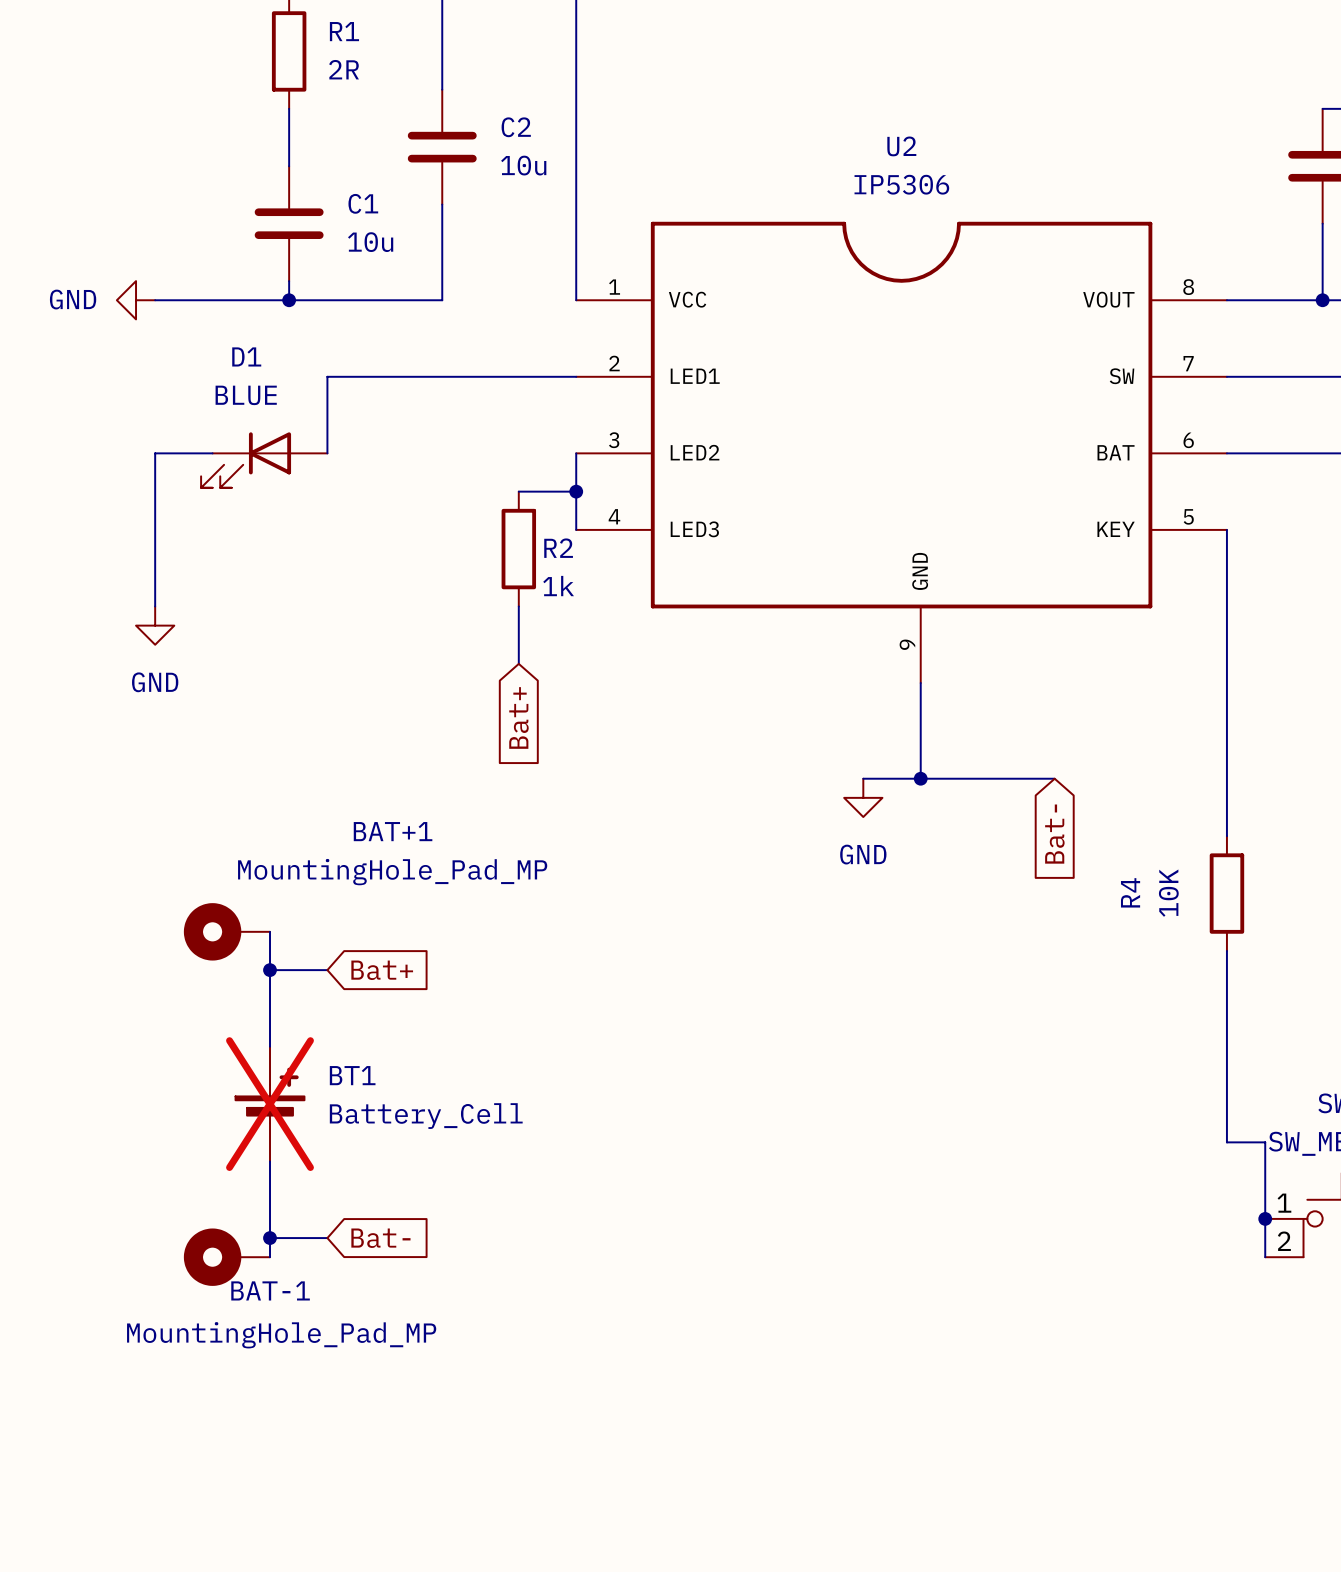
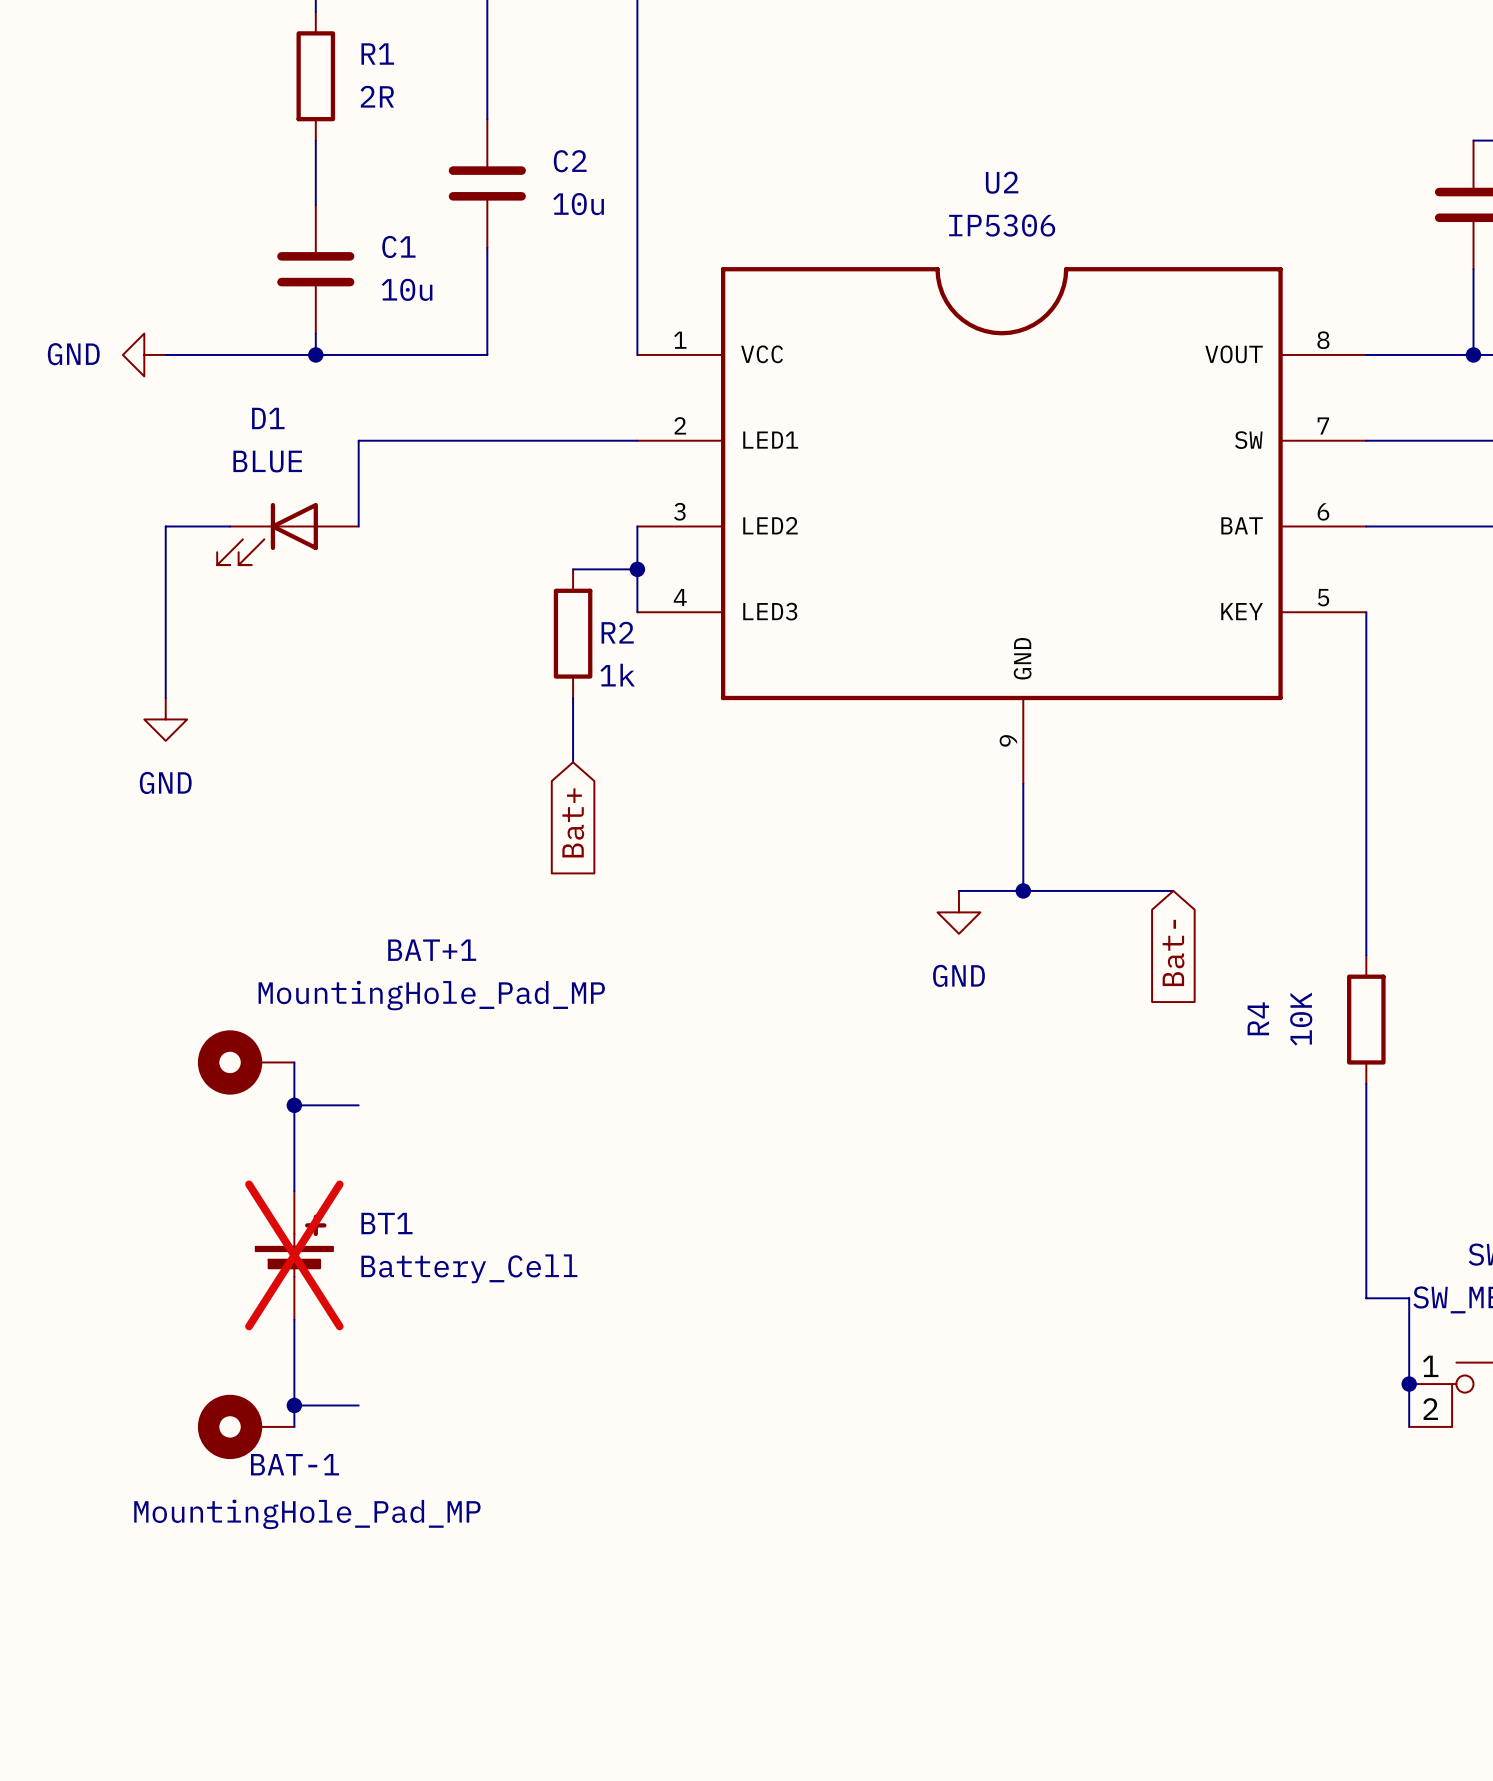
global label: Bat+ (382, 970) -> none
global label: Bat- (380, 1238) -> none

